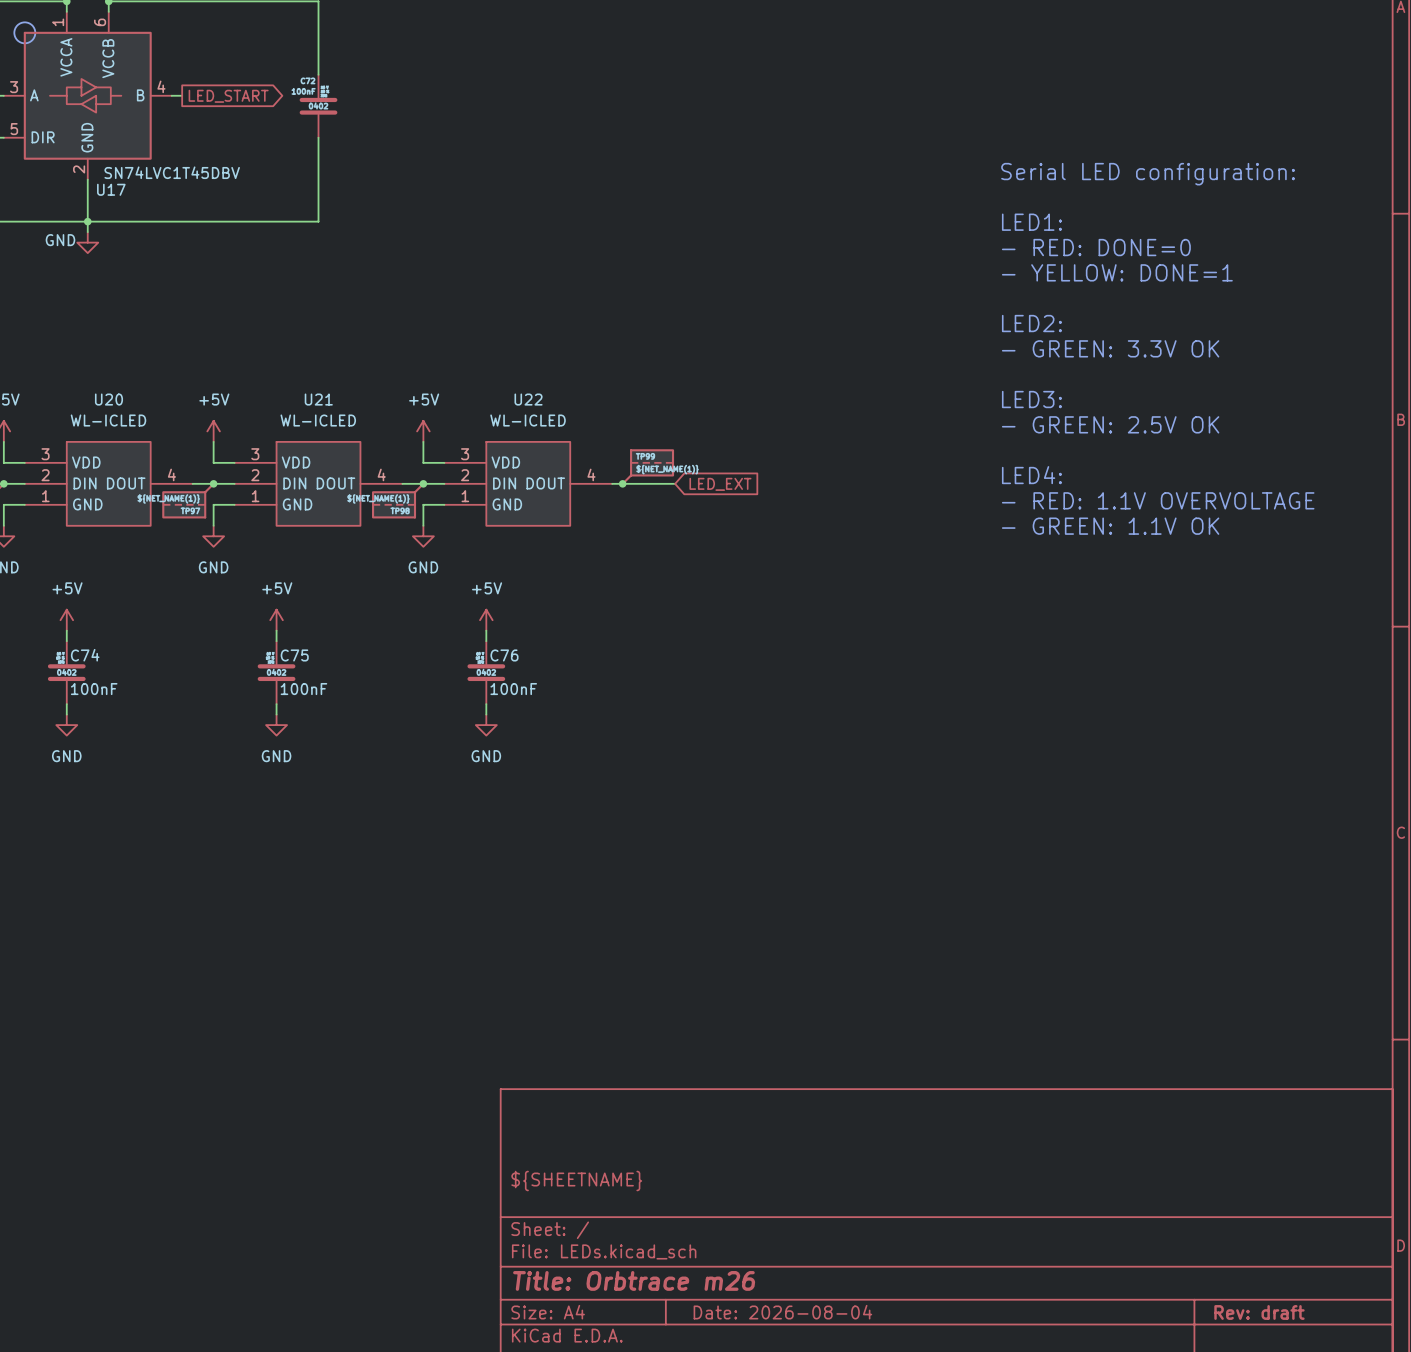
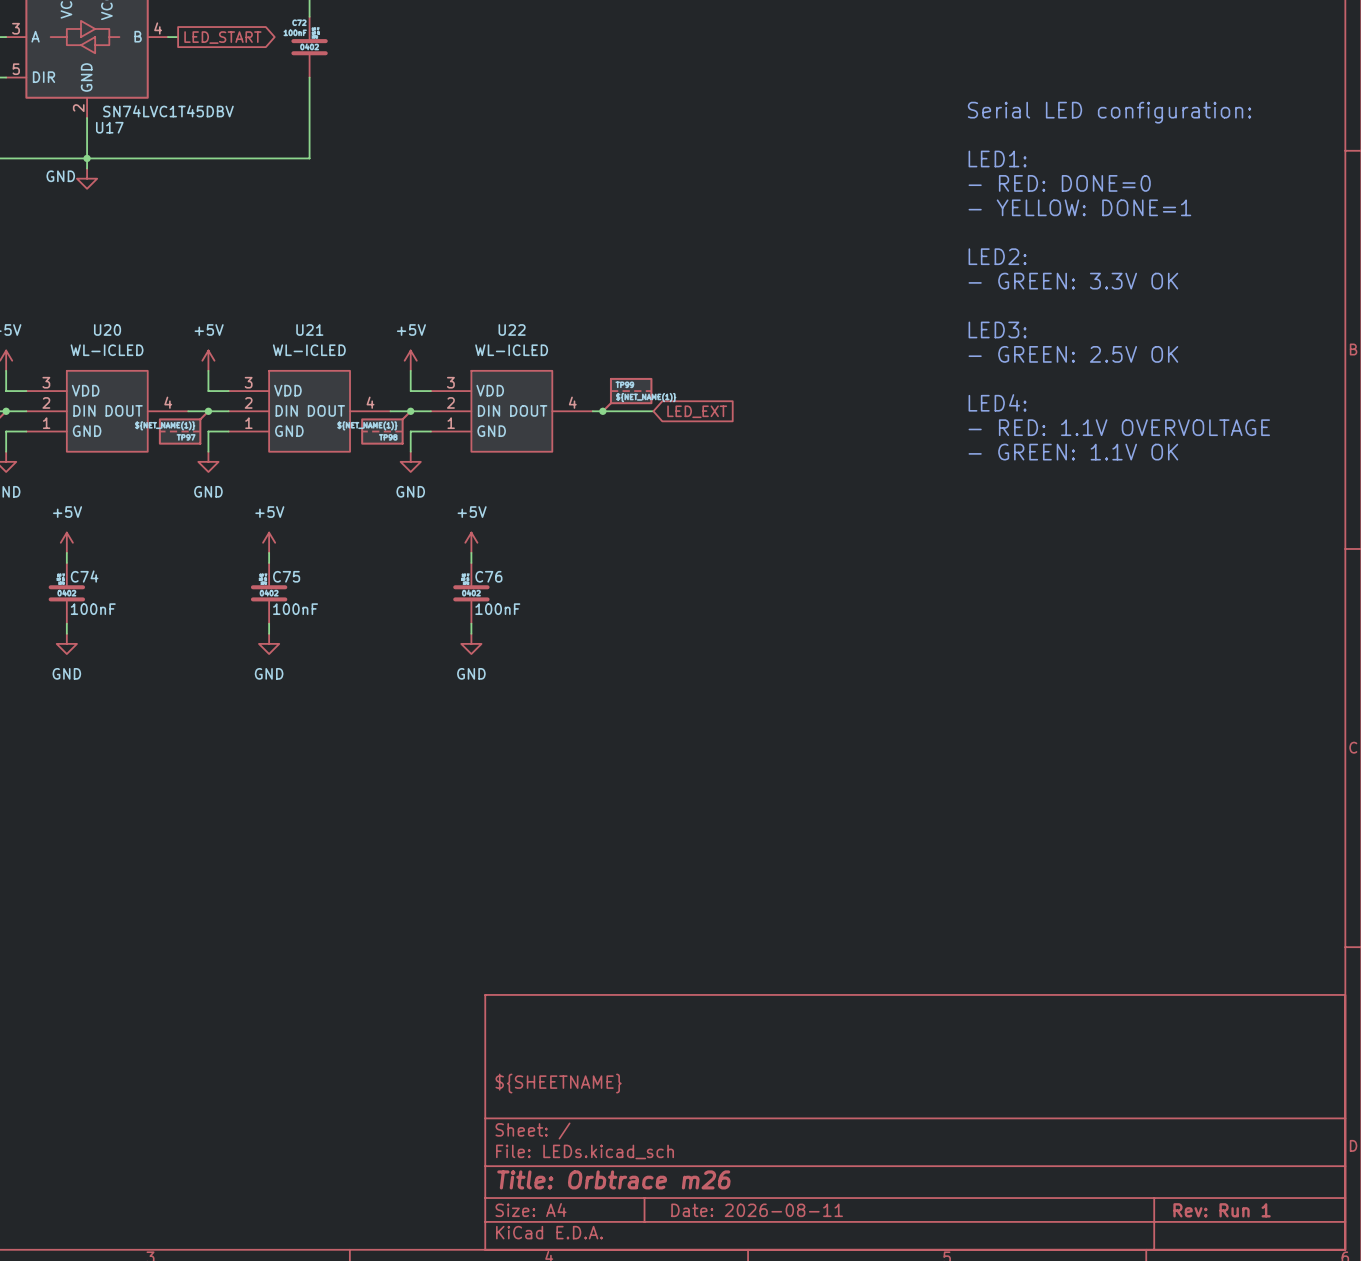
title block: Date: 2026-08-04 (782, 1312) -> Date: 2026-08-11 (757, 1210)
title block: Rev: draft (1259, 1312) -> Rev: Run 1 (1222, 1210)

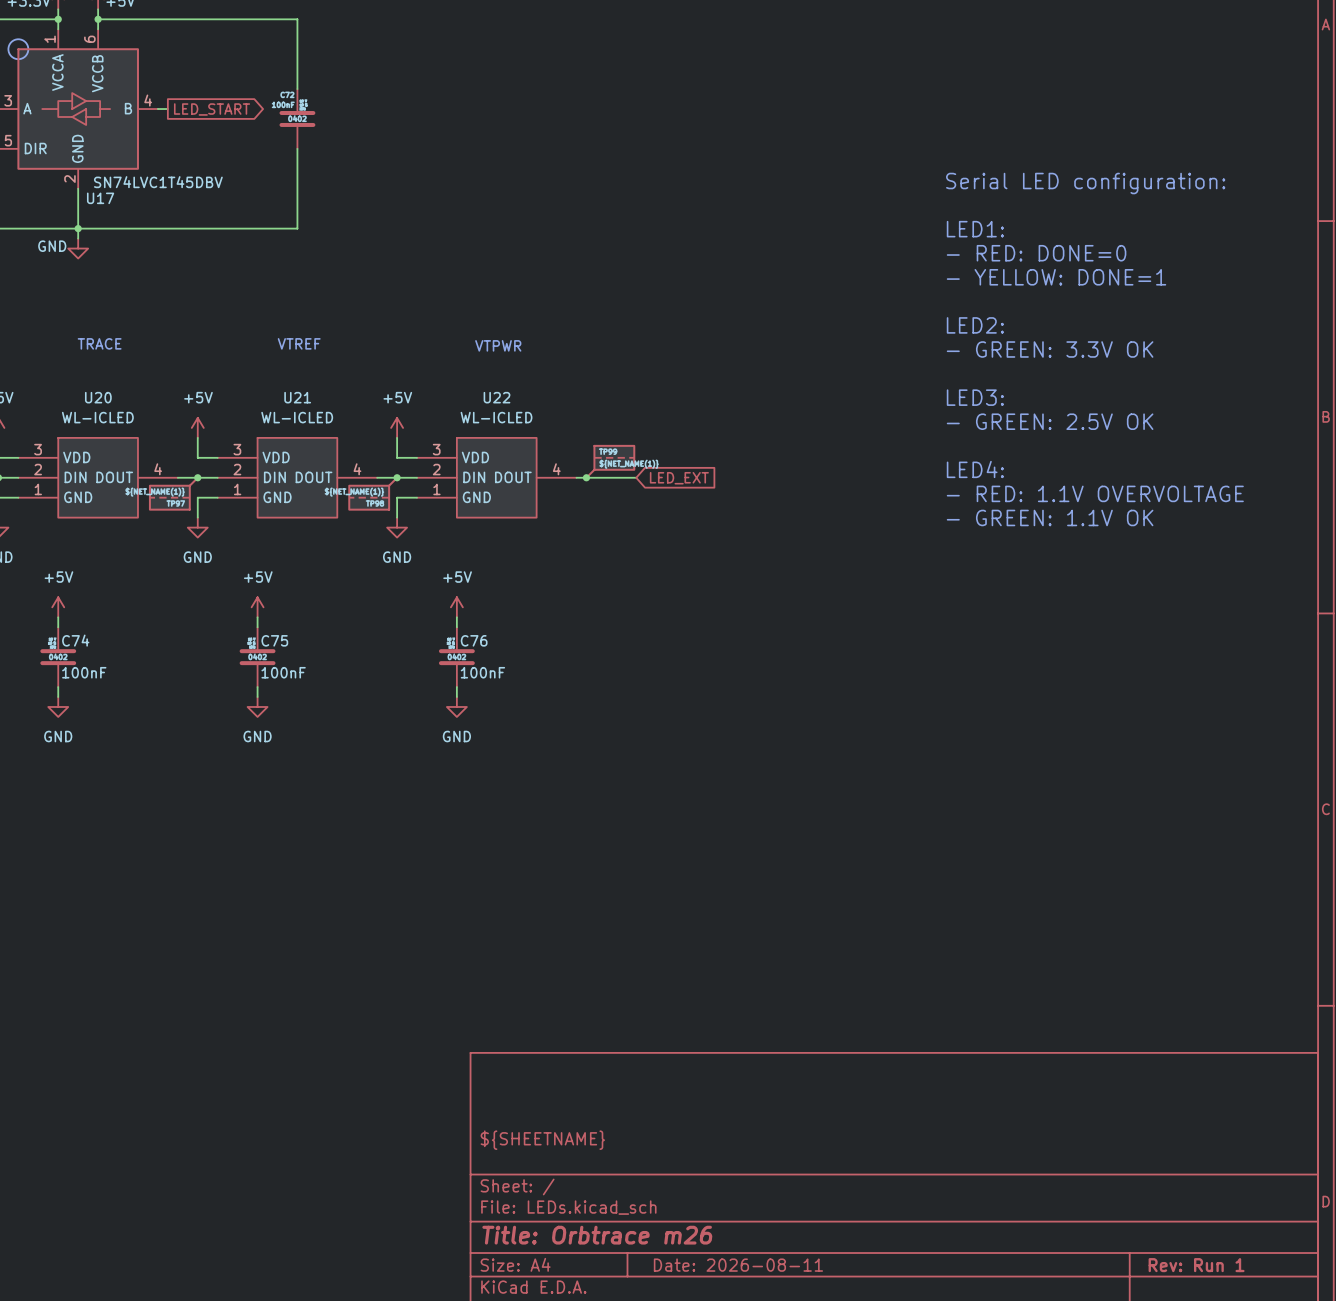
text: none -> TRACE (99, 343)
text: none -> VTREF (299, 343)
text: none -> VTPWR (498, 345)

